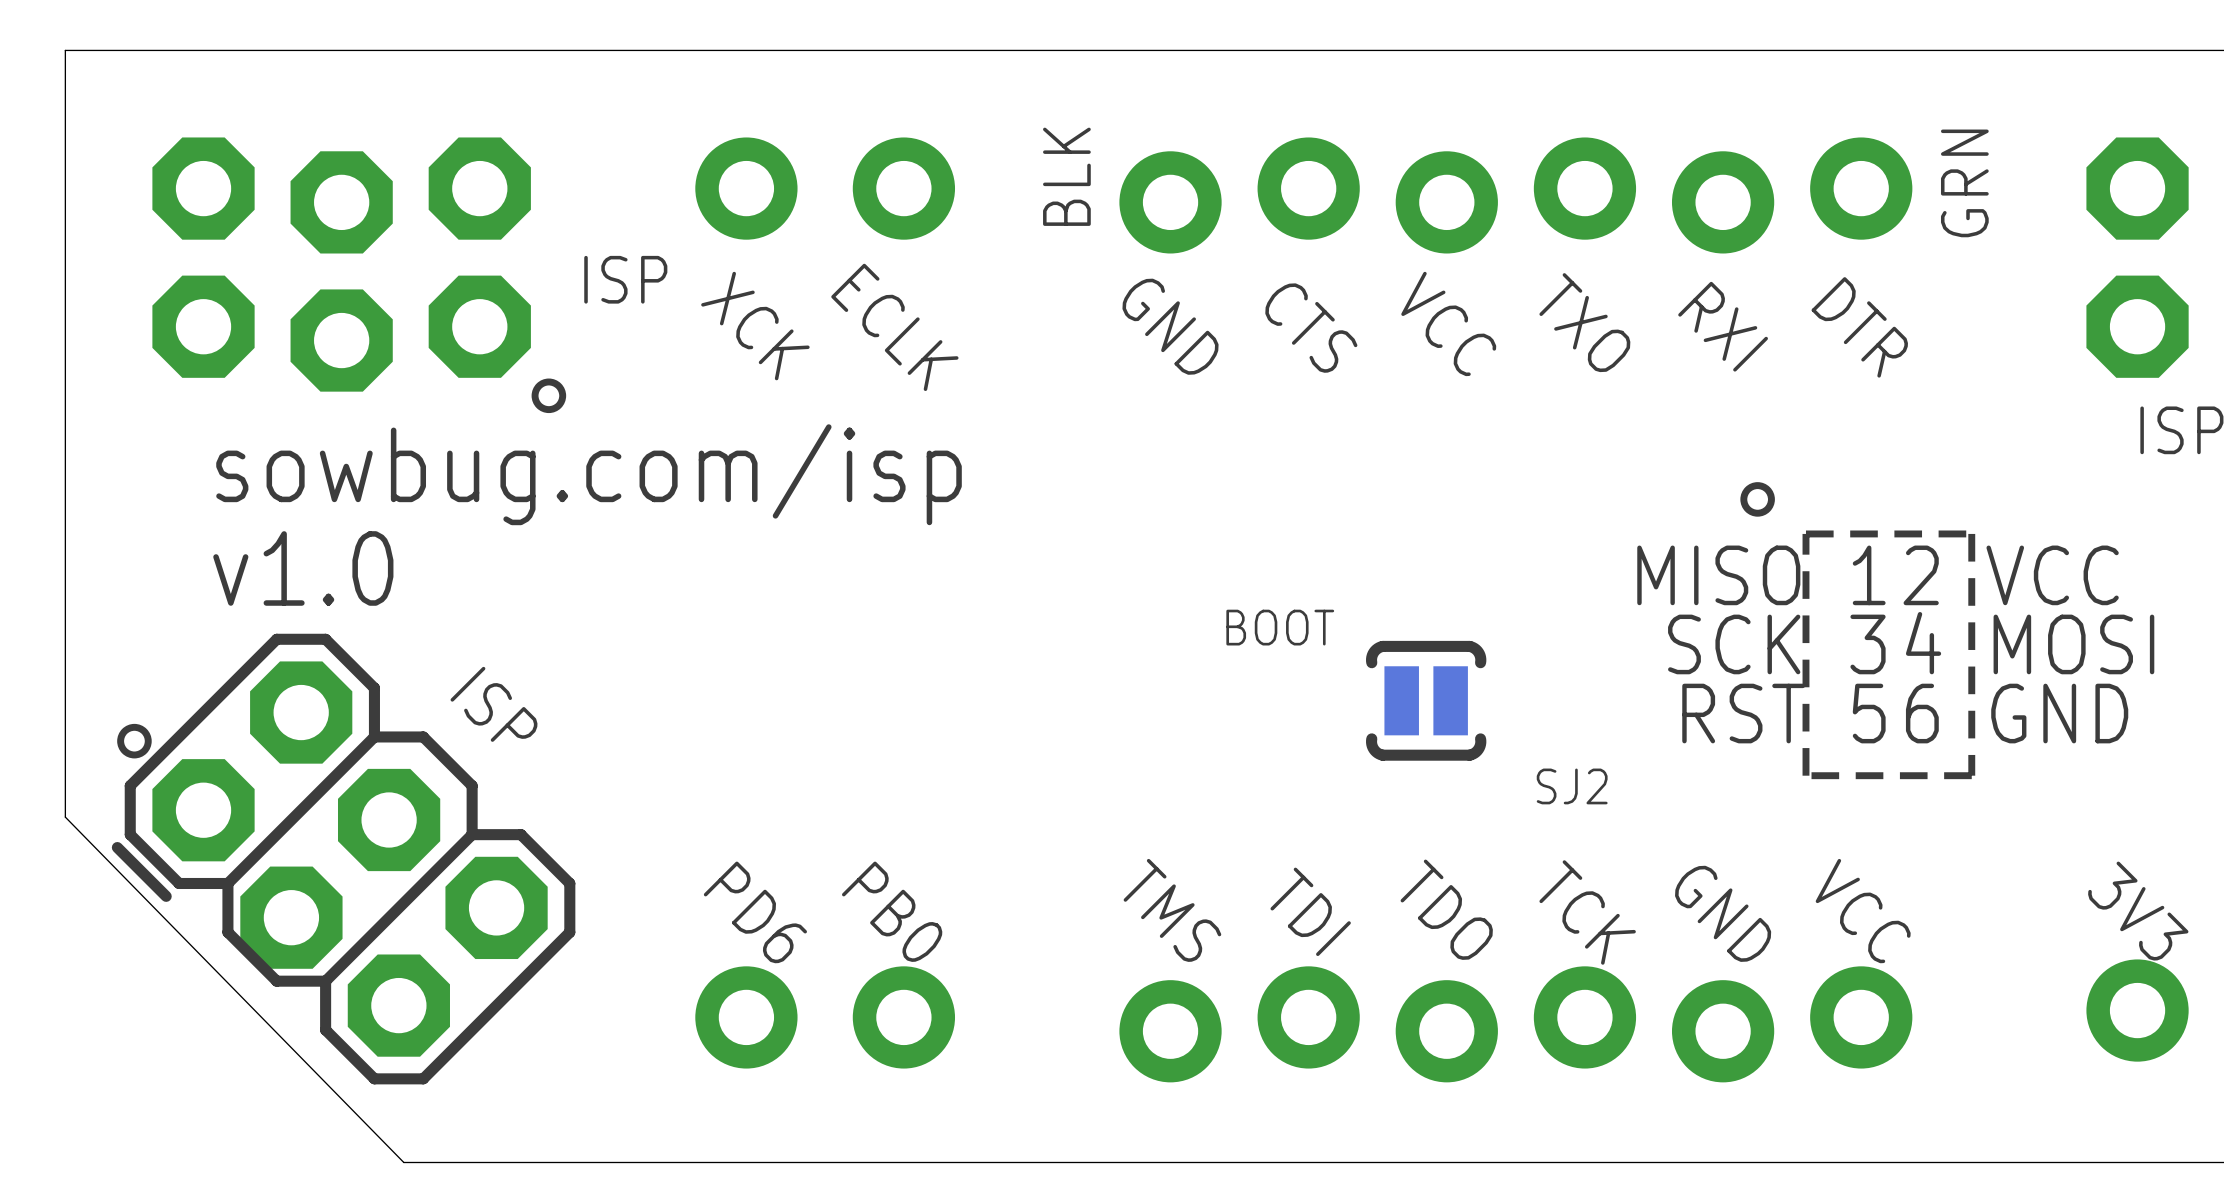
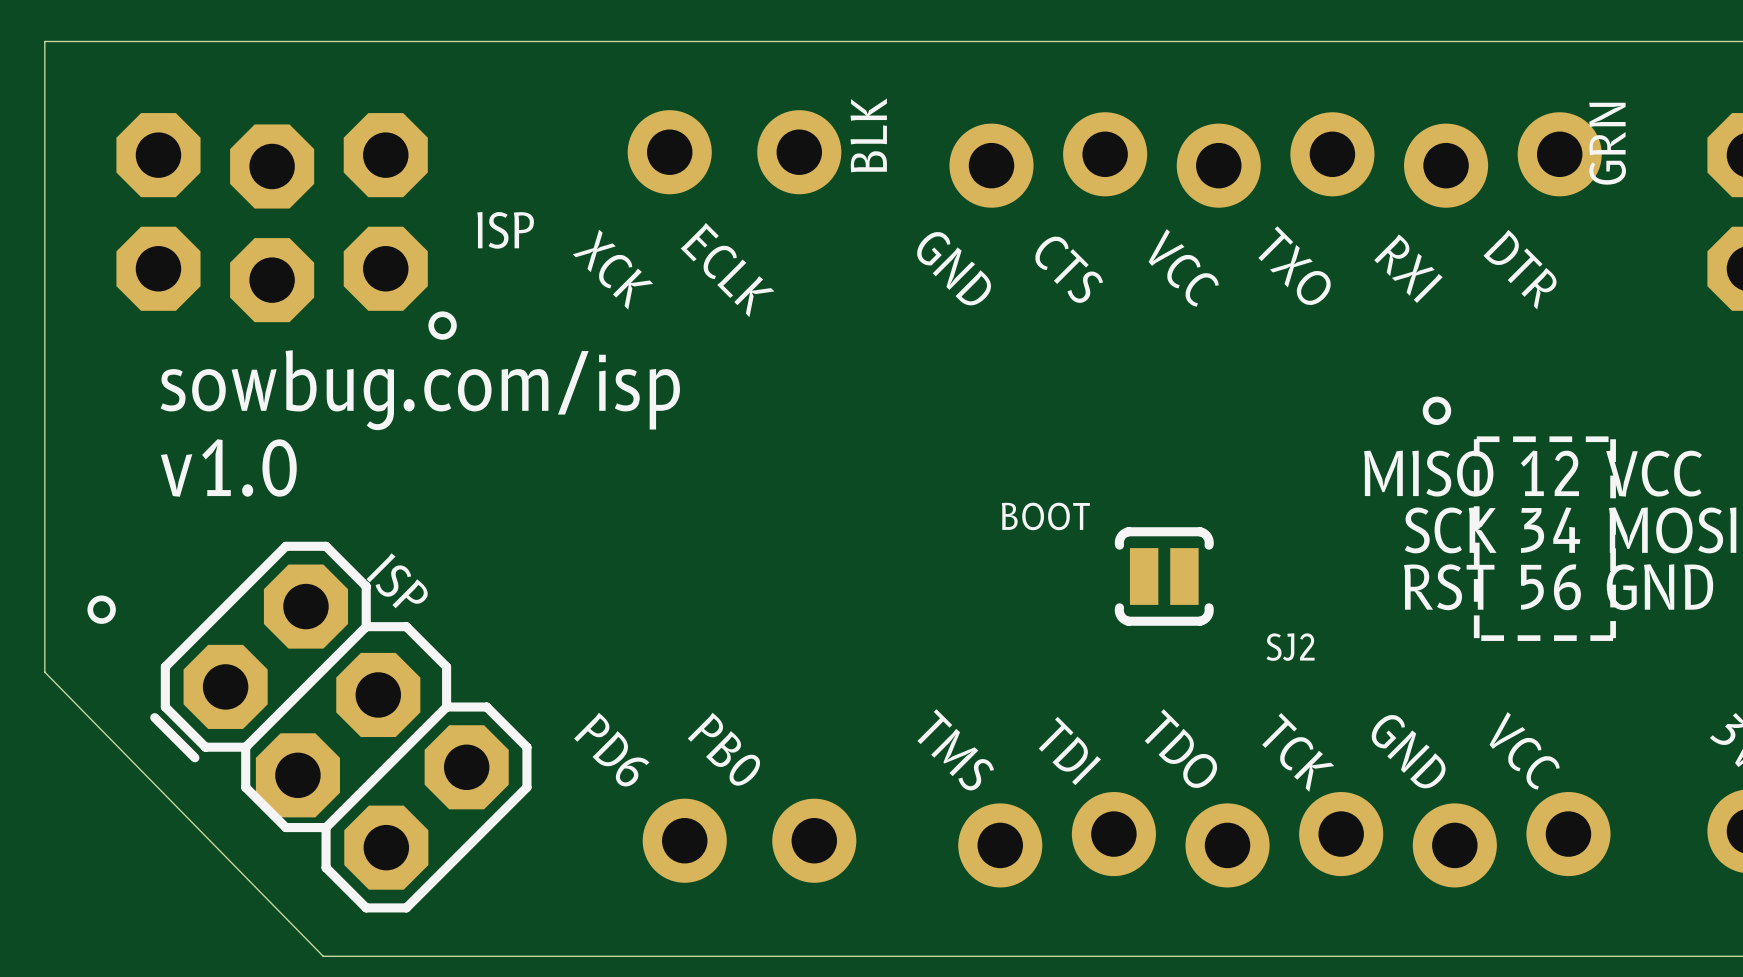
part position: (825, 188) -> (734, 152)
part position: (1515, 195) -> (1275, 159)
part position: (343, 859) -> (340, 727)
part position: (825, 1017) -> (749, 840)
part position: (1515, 1024) -> (1284, 839)

